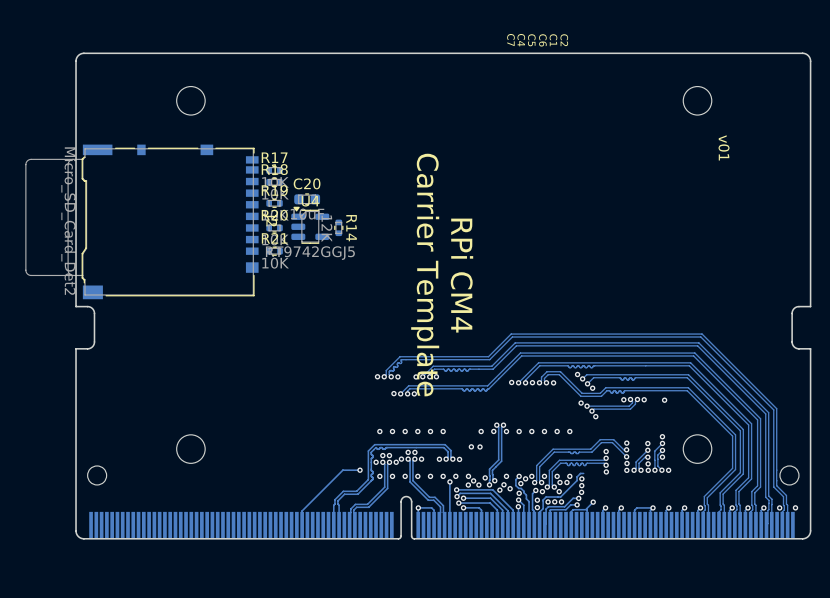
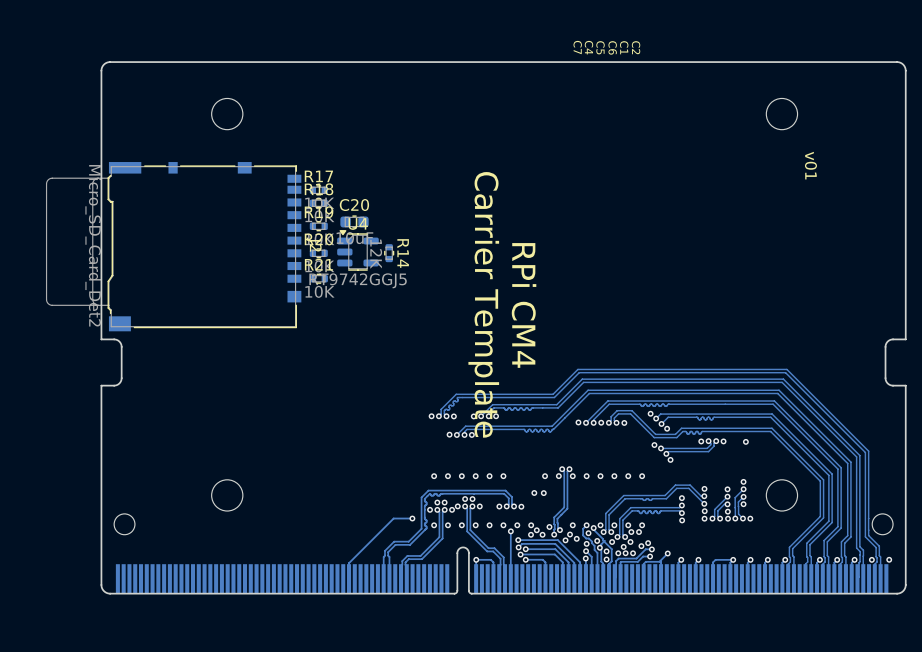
track: (583, 473) (577, 476) (577, 480) (560, 497) (546, 497) (543, 500) (543, 508) (539, 512) -> (593, 527) (611, 549) (611, 561) (609, 564)
via: (581, 478) -> none
via: (581, 485) -> none
via: none -> (597, 540)
via: (535, 490) -> none
via: none -> (648, 543)
via: (581, 492) -> none
via: none -> (641, 546)
via: none -> (599, 547)
via: none -> (623, 546)

